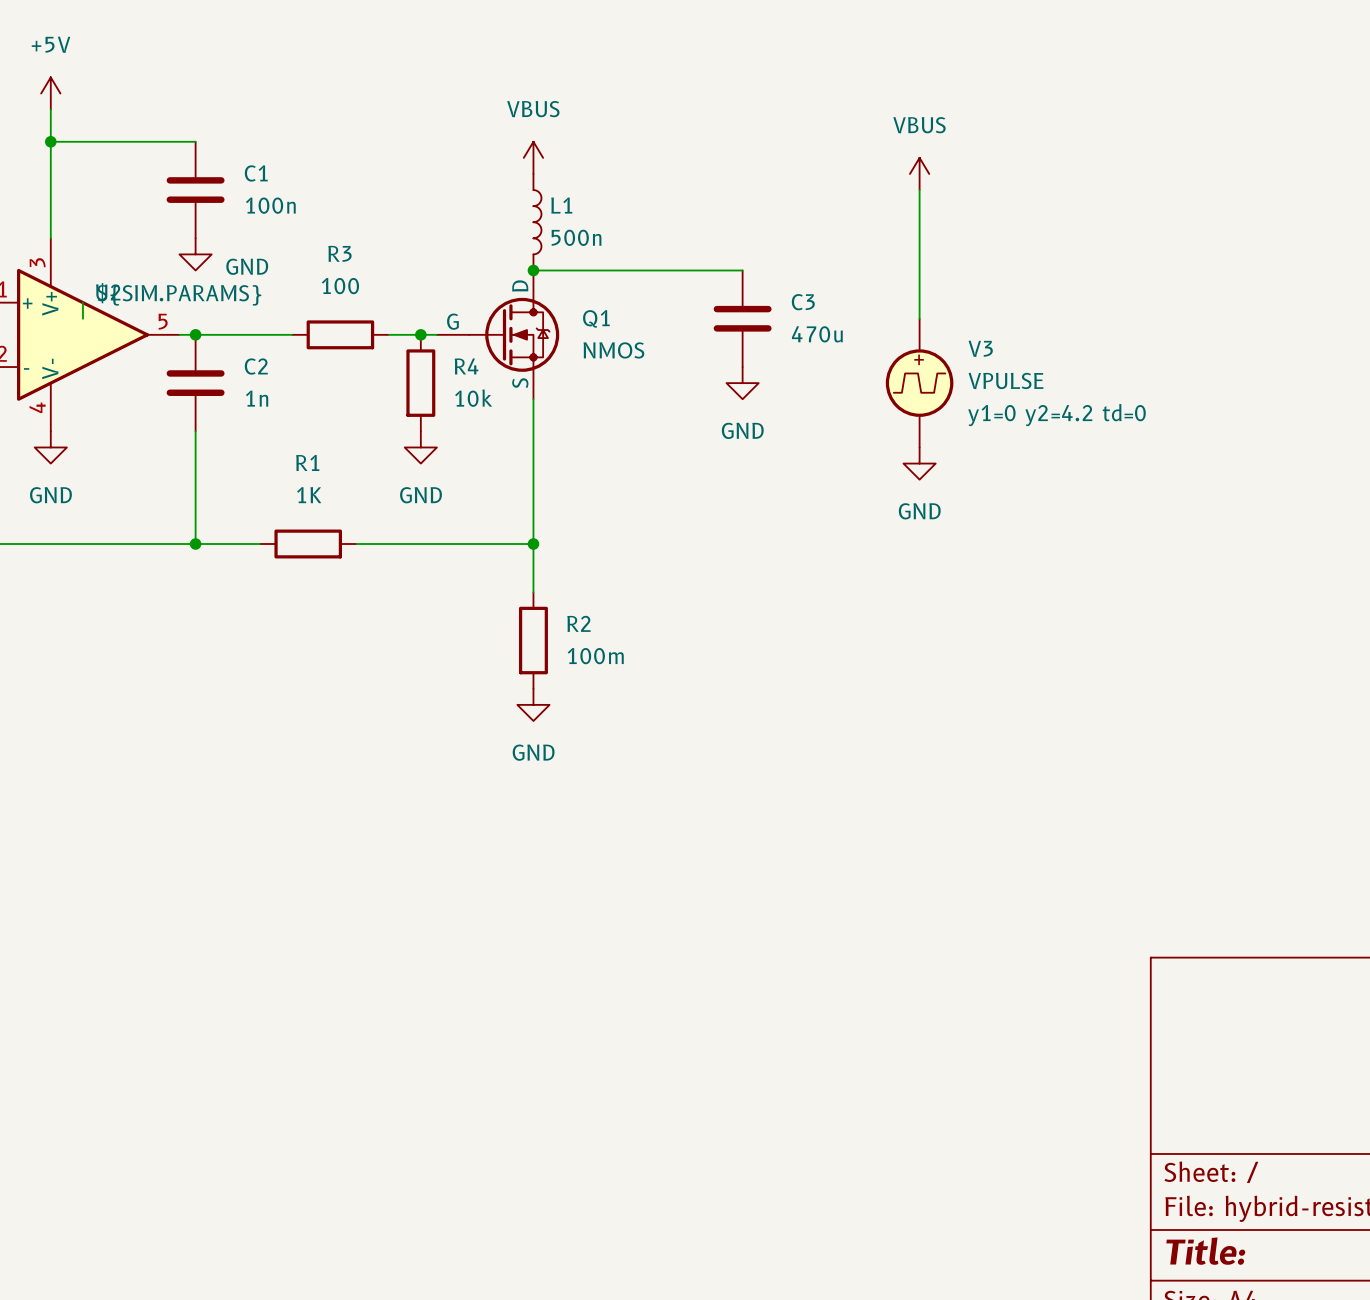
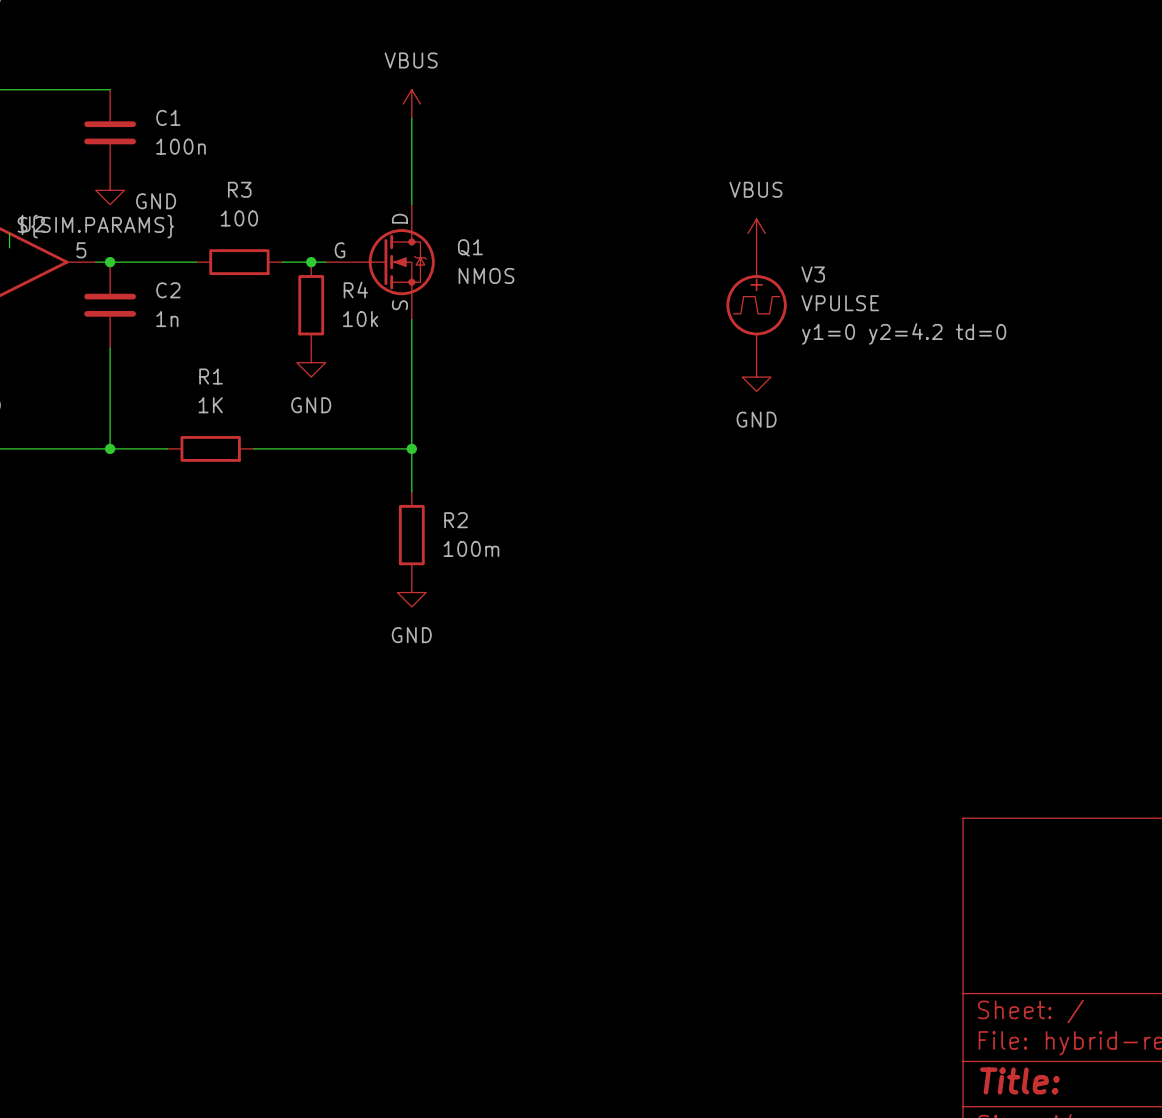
power symbol position: VBUS (919, 173) -> VBUS (756, 233)
wire: (919, 190) (919, 318) -> none
L1: 500n (537, 222) -> none
wire: (533, 270) (742, 270) -> (411, 204) (411, 118)
junction: (533, 270) -> none
C3: 470u (742, 318) -> none
power symbol: GND (742, 383) -> none

